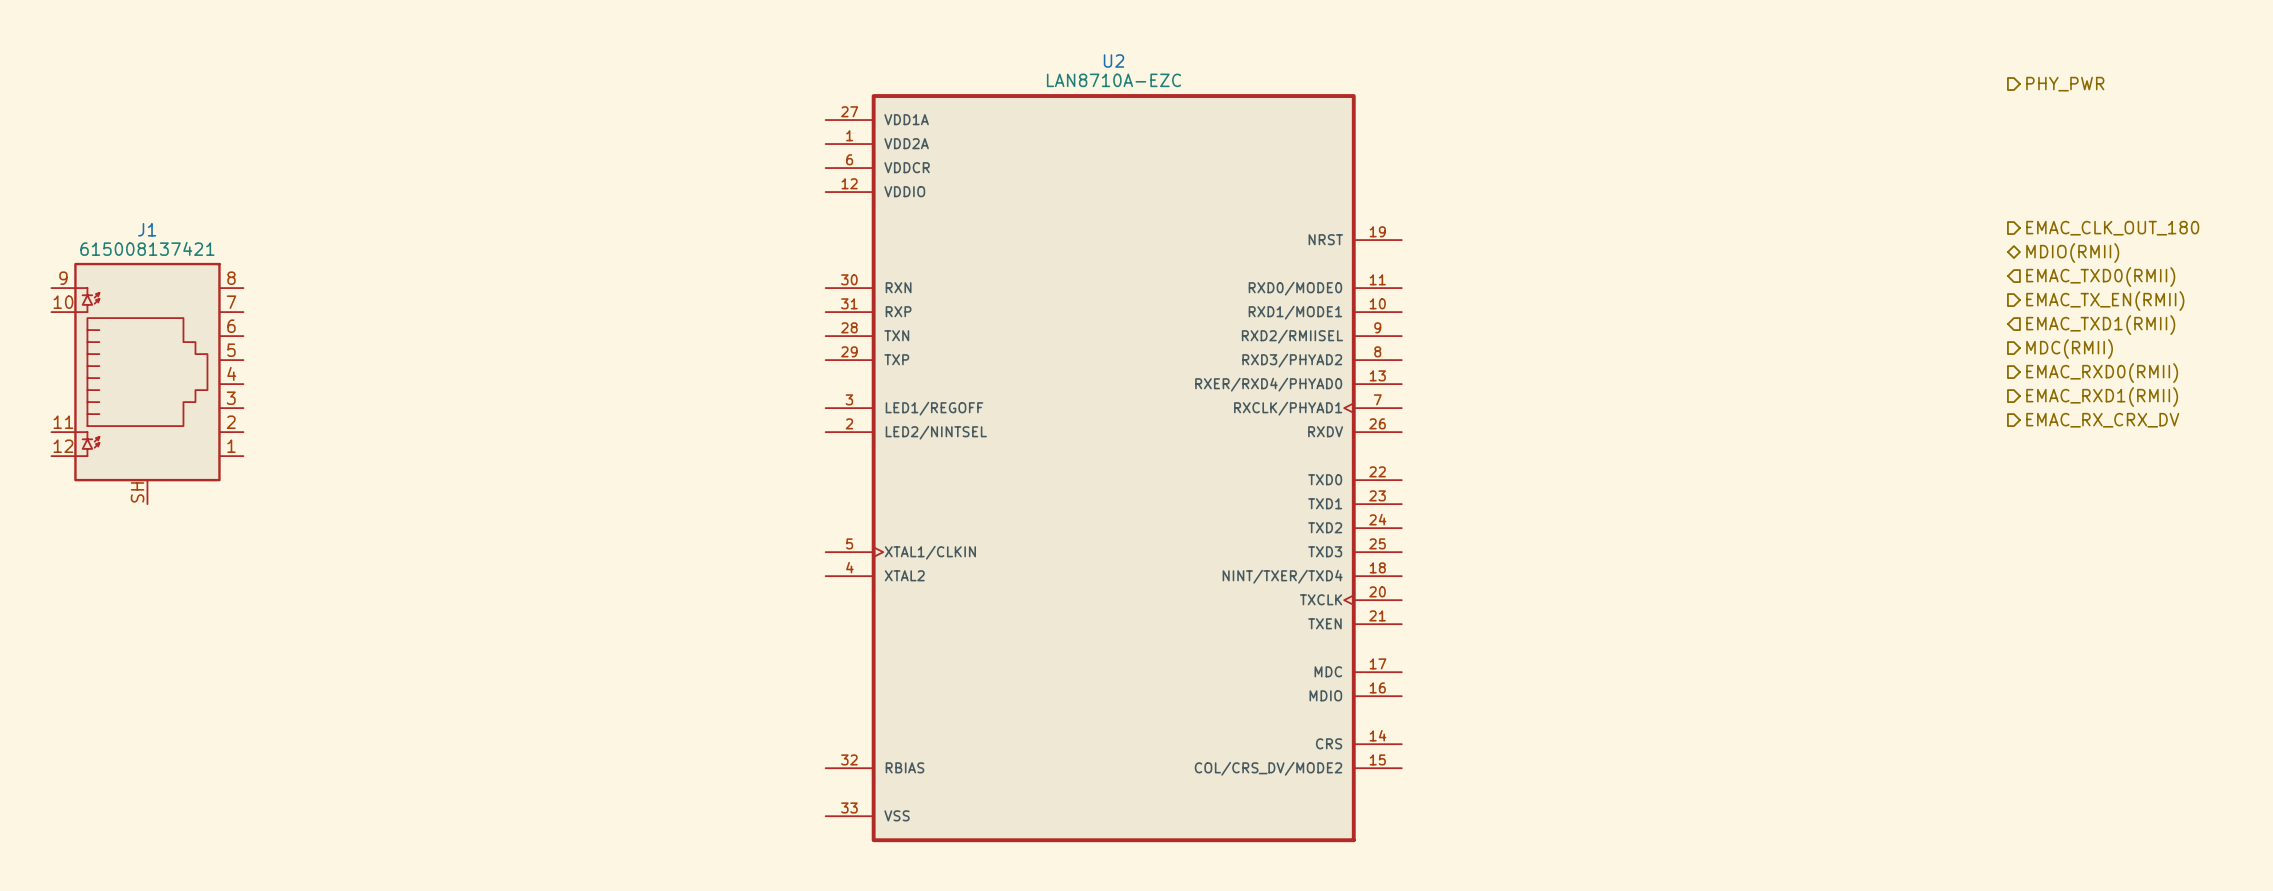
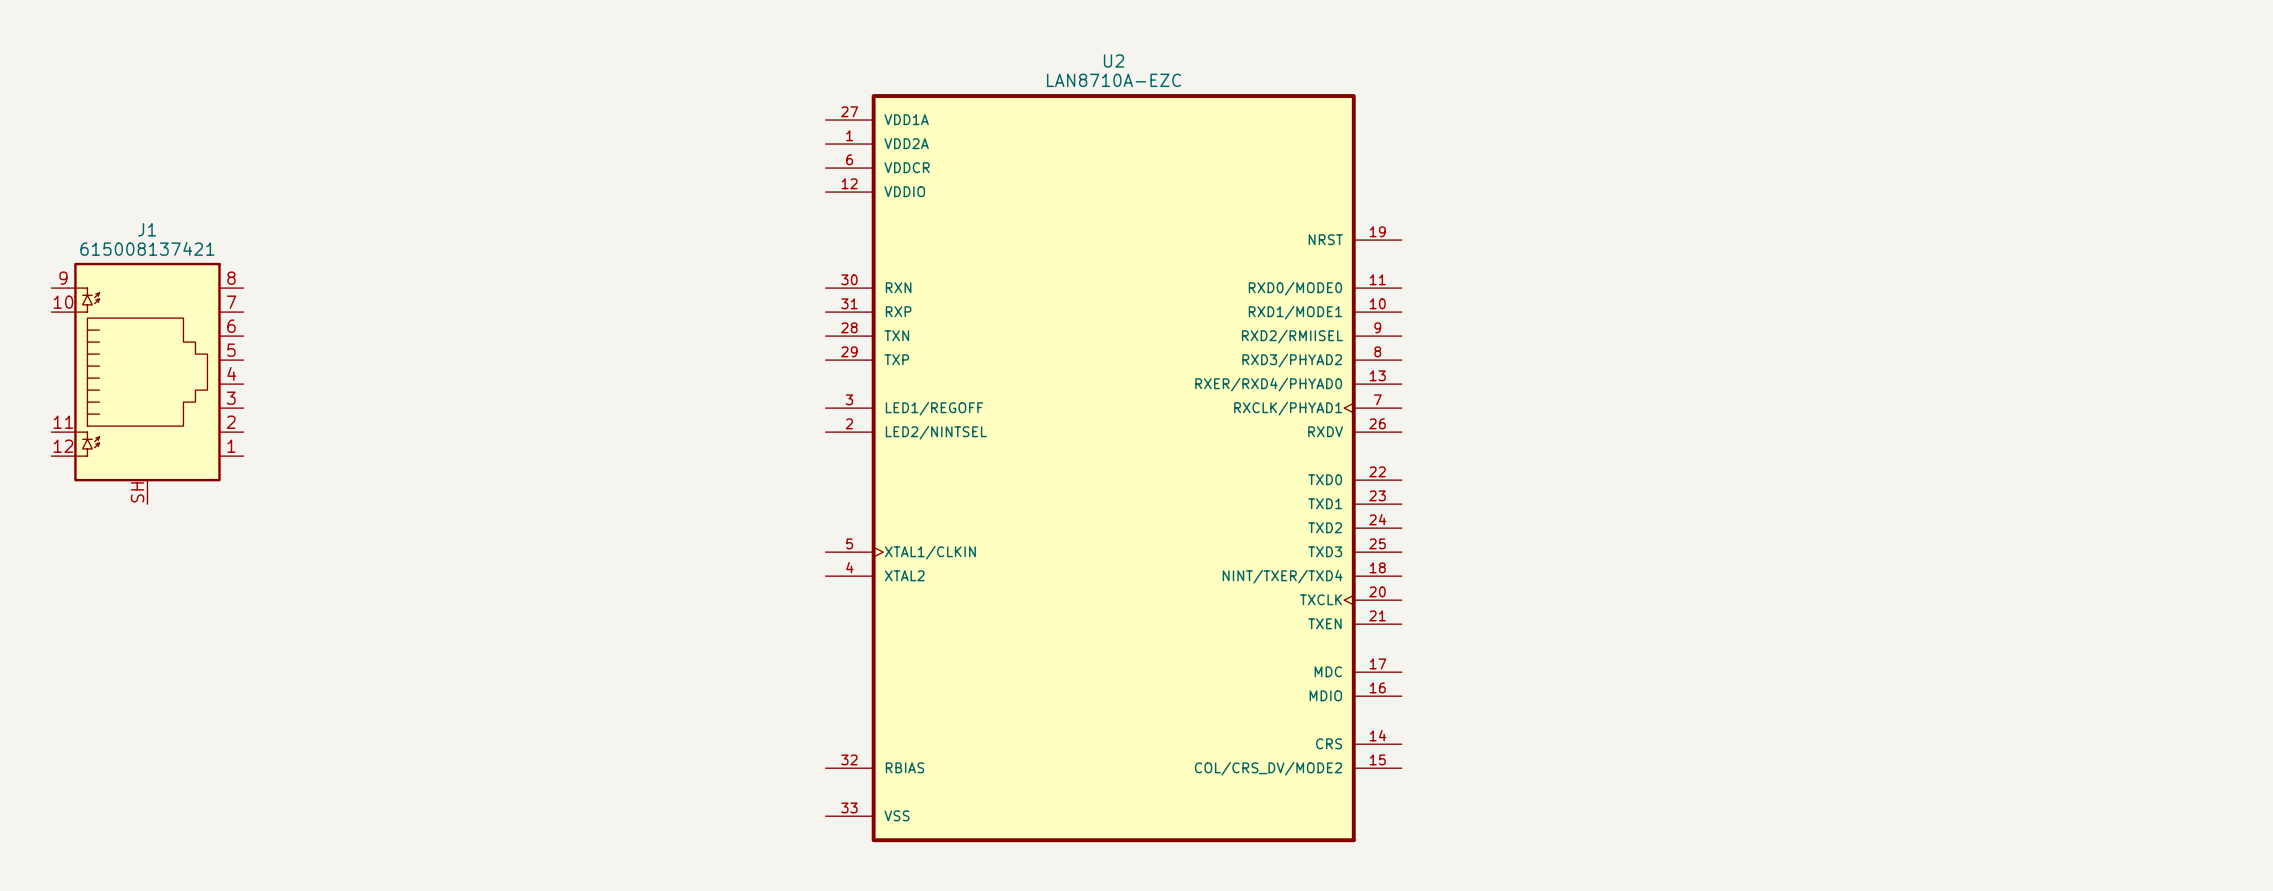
hierarchical label: PHY_PWR (2065, 84) -> none
hierarchical label: EMAC_CLK_OUT_180 (2112, 228) -> none
hierarchical label: MDIO(RMII) (2072, 253) -> none
hierarchical label: EMAC_TXD0(RMII) (2100, 277) -> none
hierarchical label: EMAC_TX_EN(RMII) (2105, 301) -> none
hierarchical label: EMAC_TXD1(RMII) (2100, 325) -> none
hierarchical label: MDC(RMII) (2069, 349) -> none
hierarchical label: EMAC_RXD0(RMII) (2102, 373) -> none
hierarchical label: EMAC_RXD1(RMII) (2102, 397) -> none
hierarchical label: EMAC_RX_CRX_DV (2102, 420) -> none

